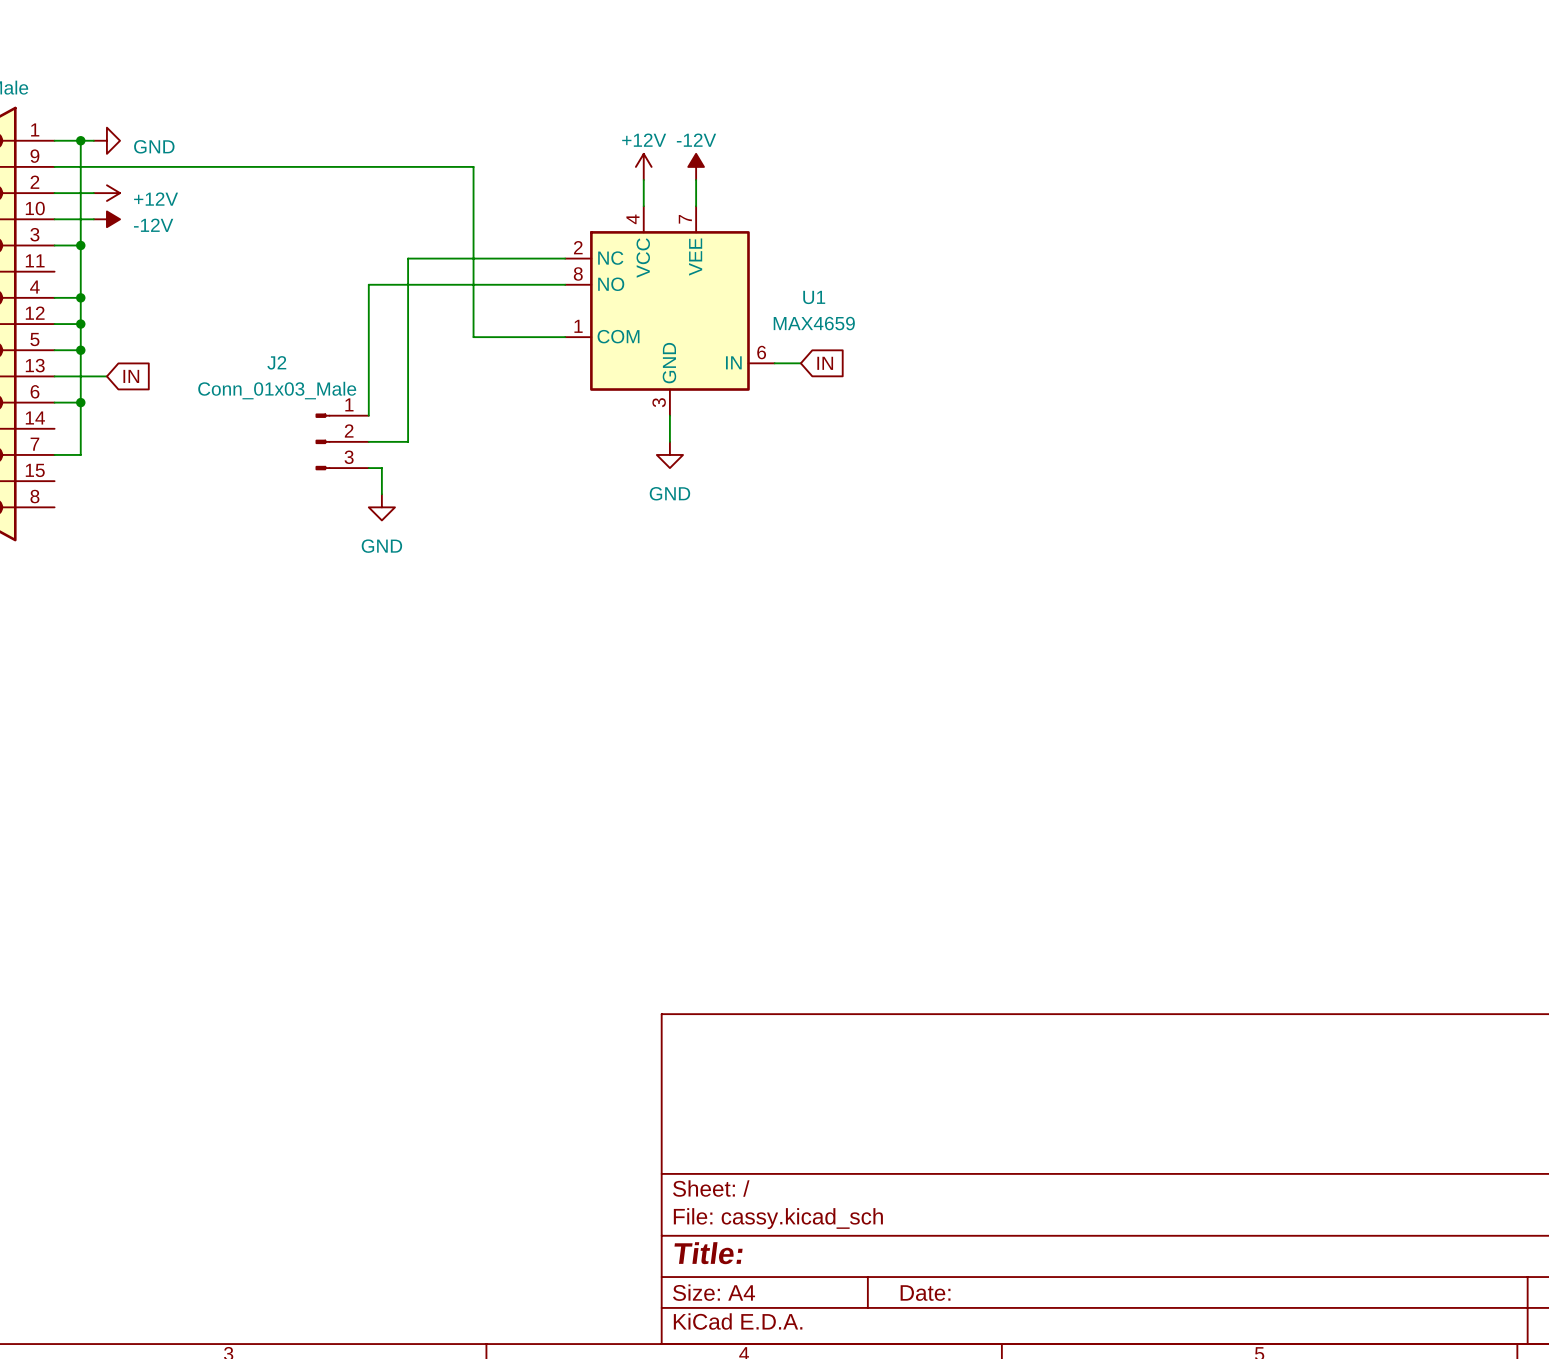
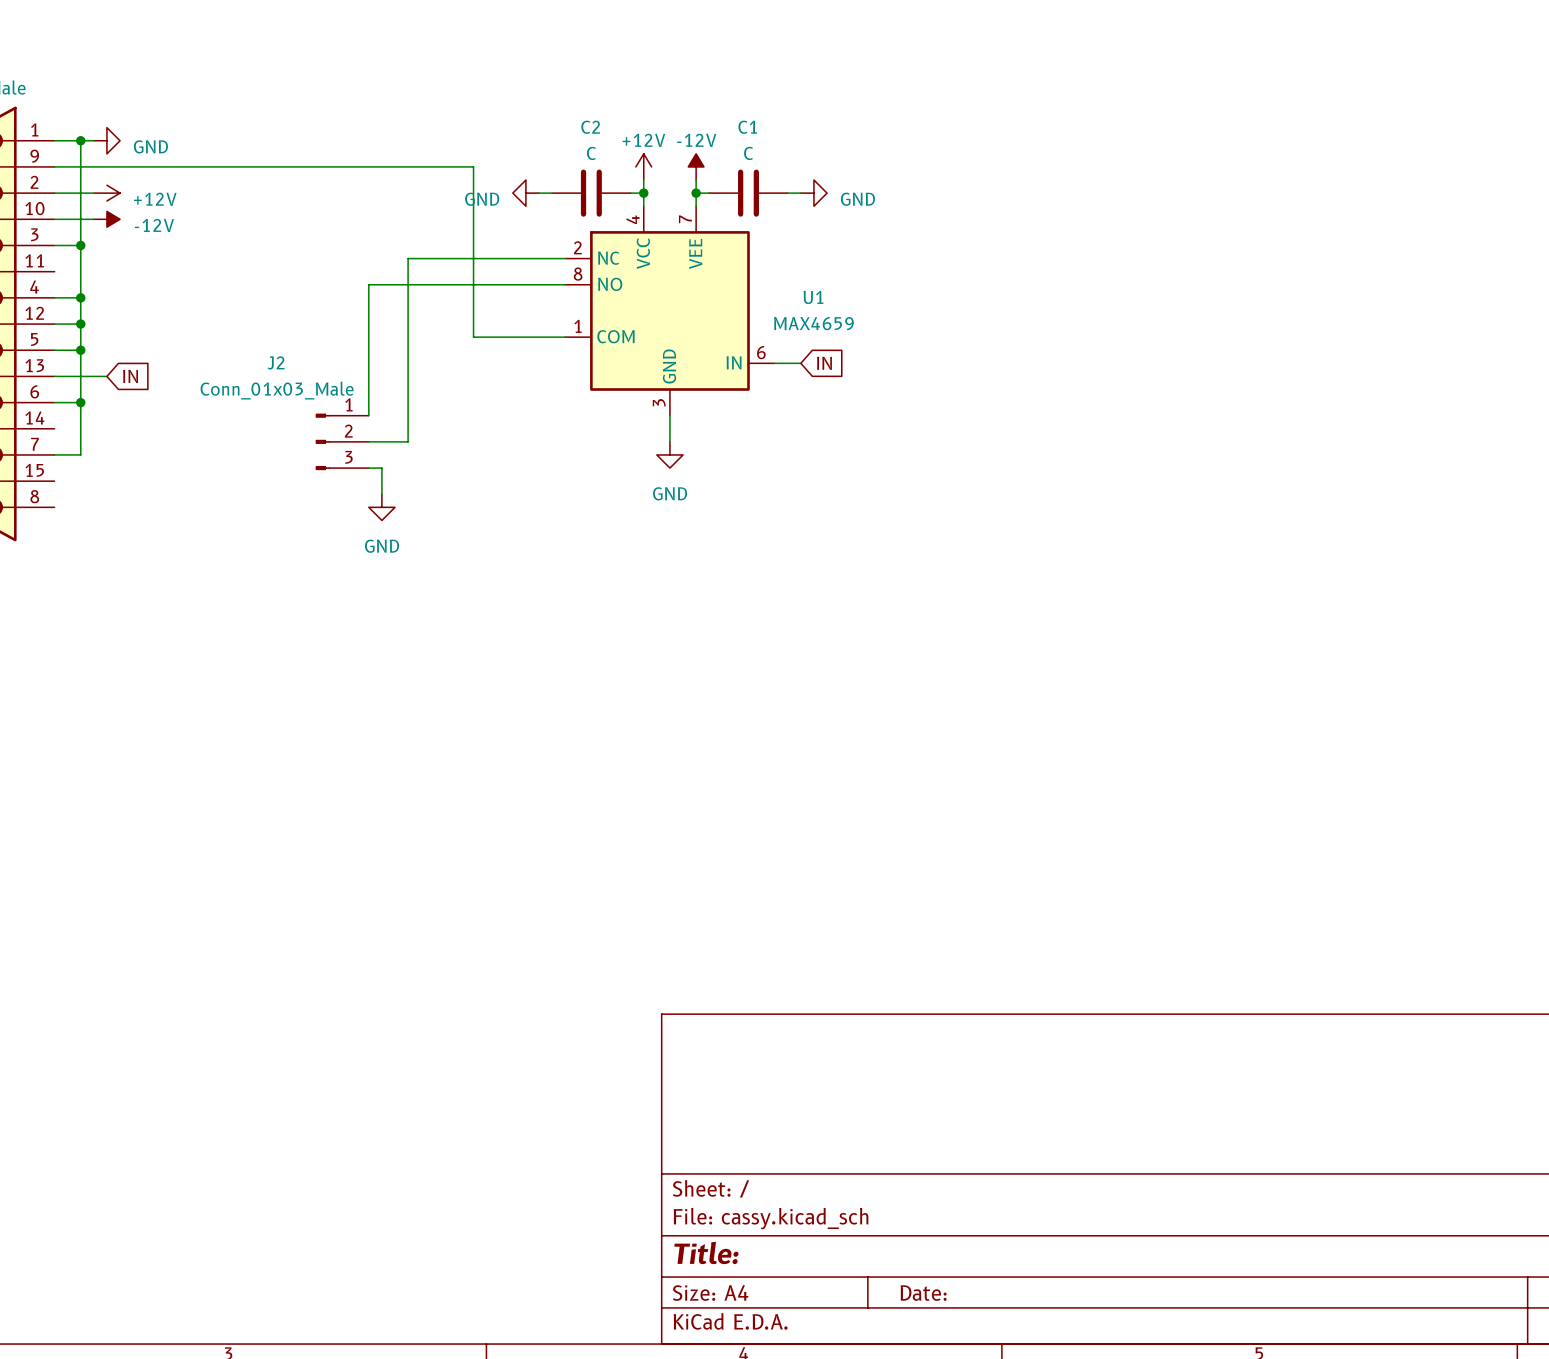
power symbol: none -> GND (525, 193)
wire: none -> (539, 193) (552, 193)
C2: none -> C (591, 193)
wire: none -> (630, 193) (643, 193)
junction: none -> (643, 193)
wire: none -> (696, 193) (709, 193)
junction: none -> (696, 193)
C1: none -> C (748, 193)
wire: none -> (787, 193) (800, 193)
power symbol: none -> GND (813, 193)

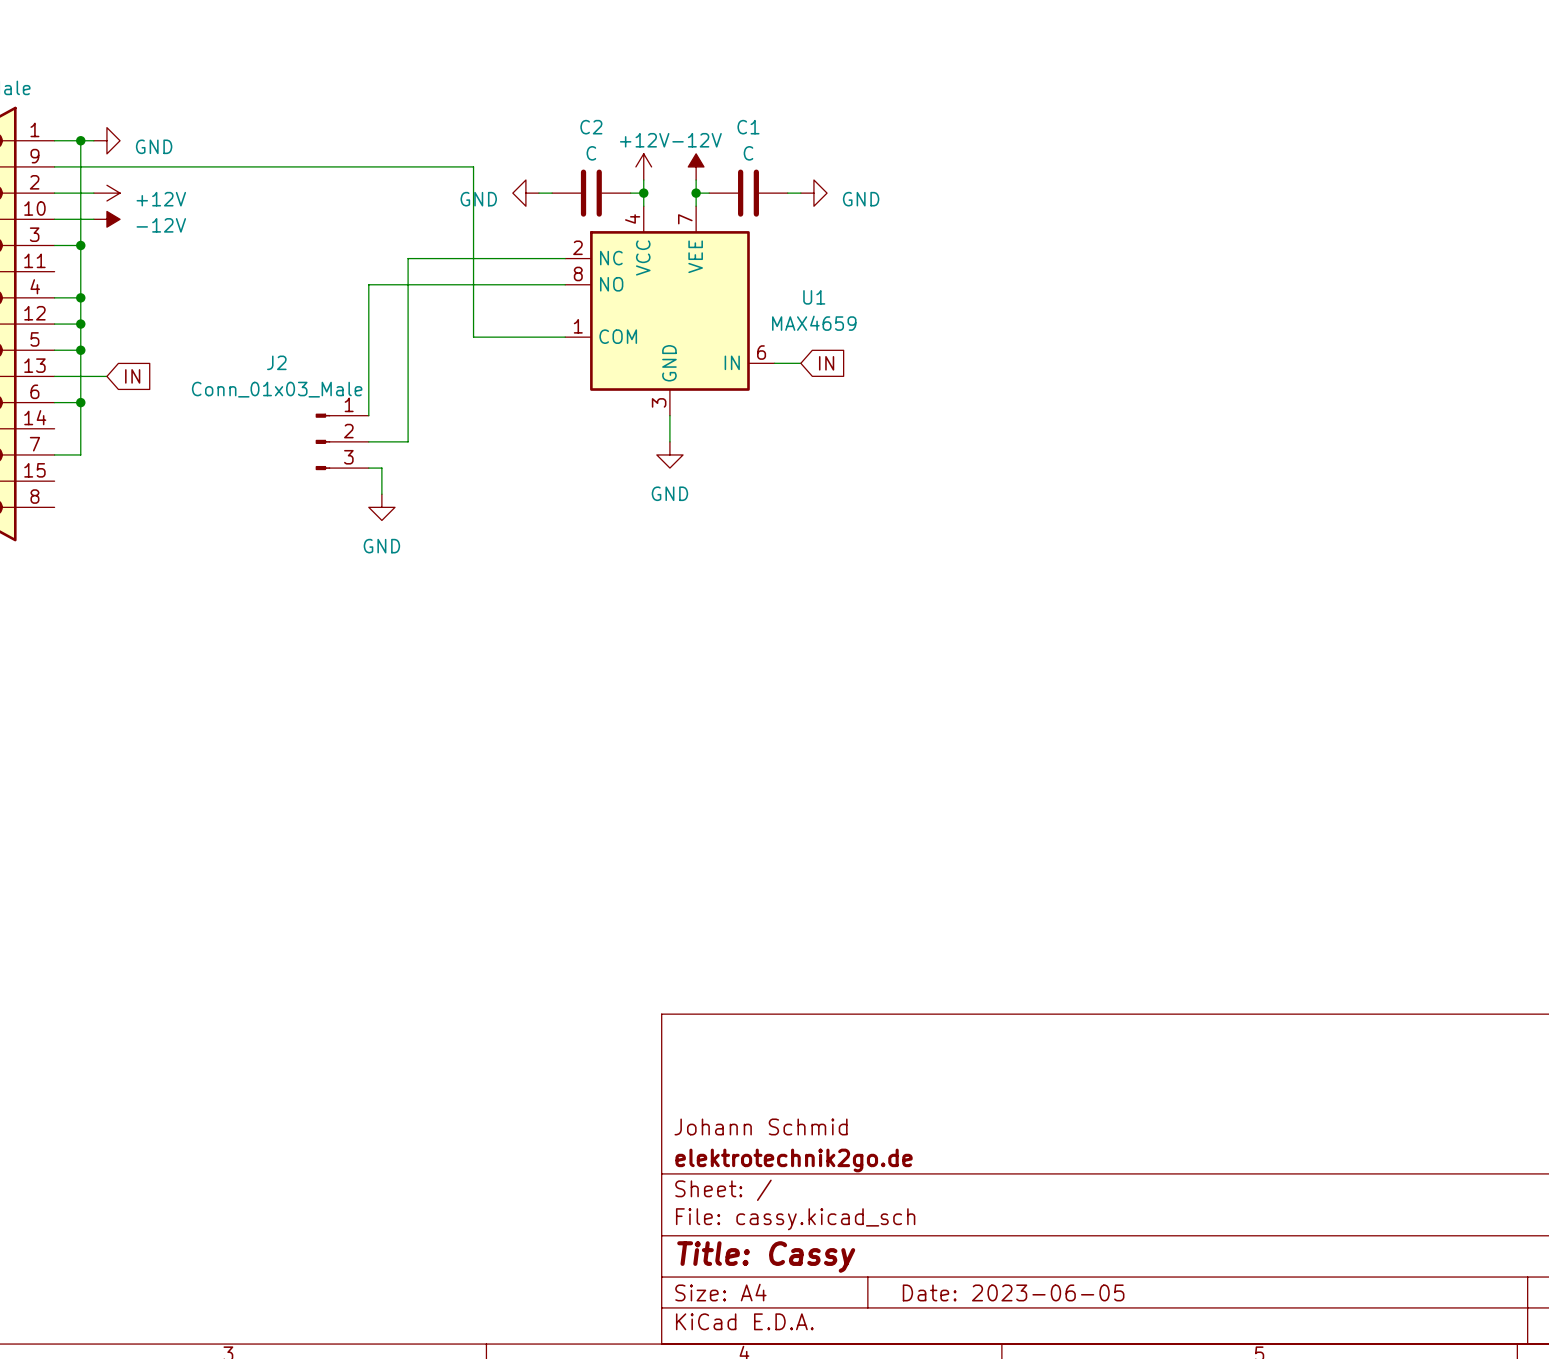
title block: none -> Johann Schmid (761, 1126)
title block: none -> elektrotechnik2go.de (794, 1160)
title block: Title: (706, 1252) -> Title: Cassy (766, 1257)
title block: Date: (923, 1293) -> Date: 2023-06-05 (1013, 1292)

